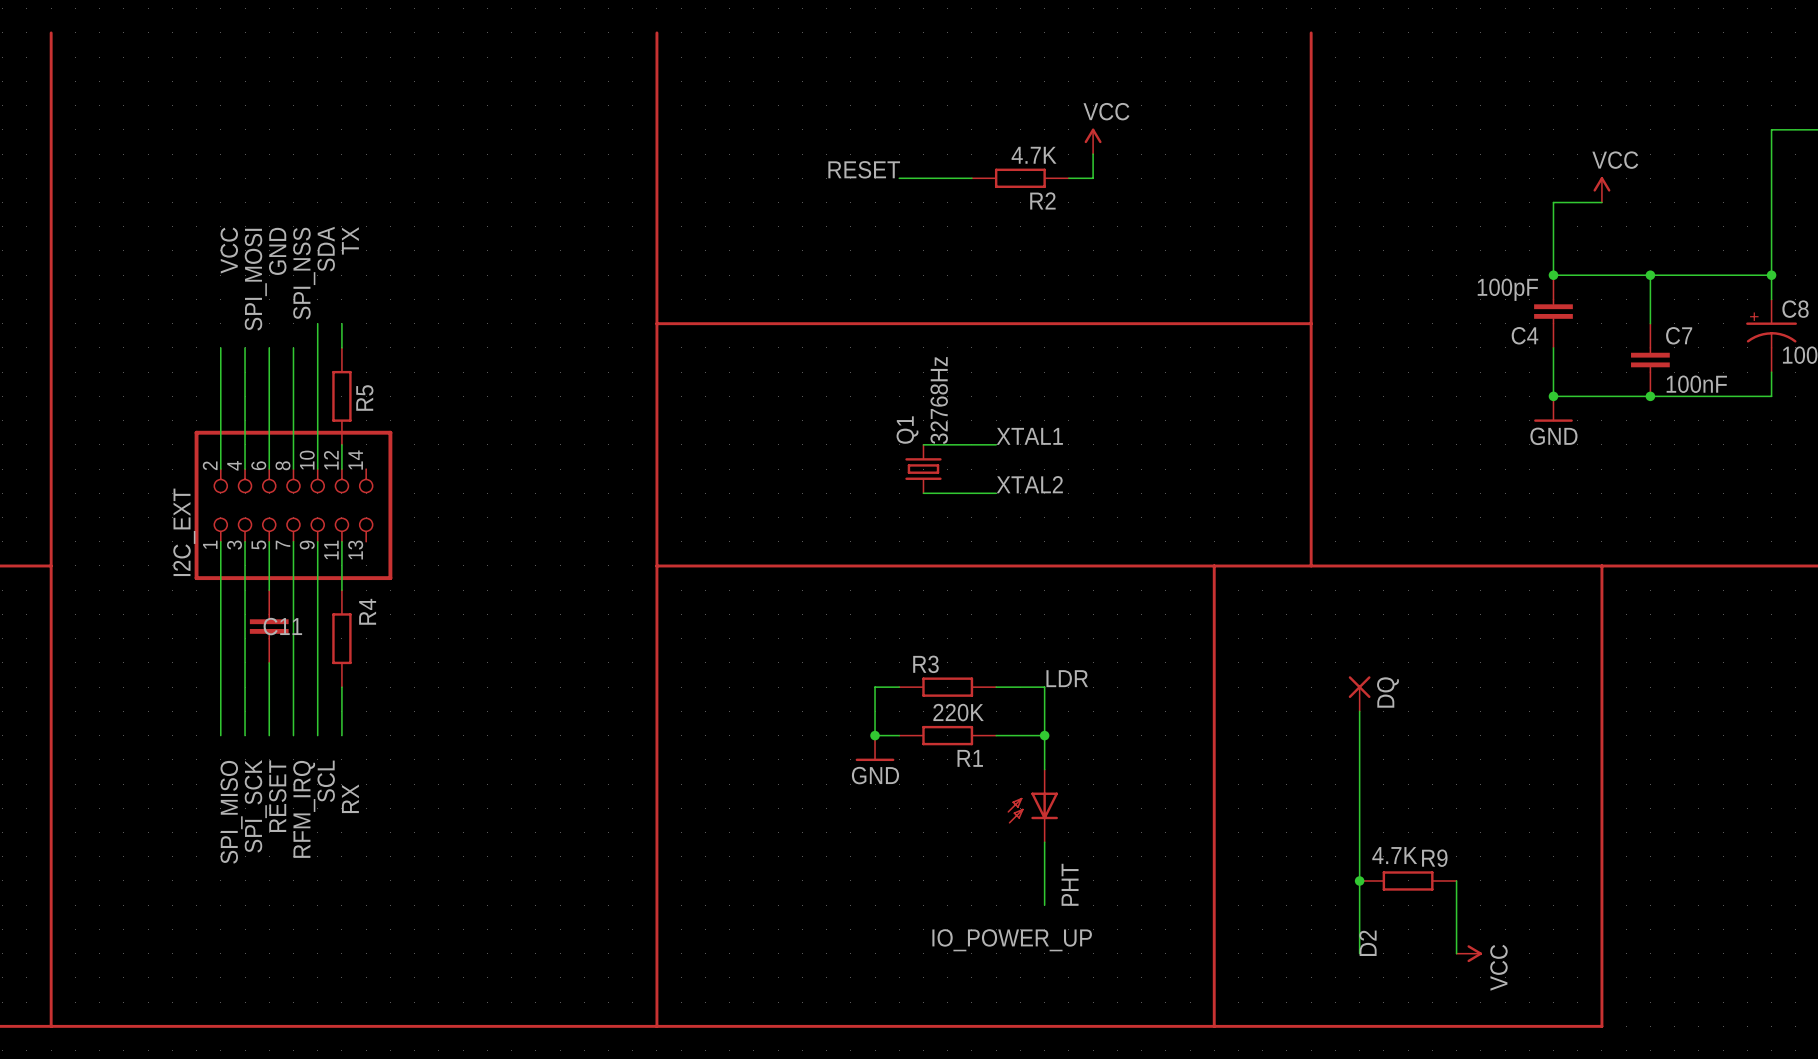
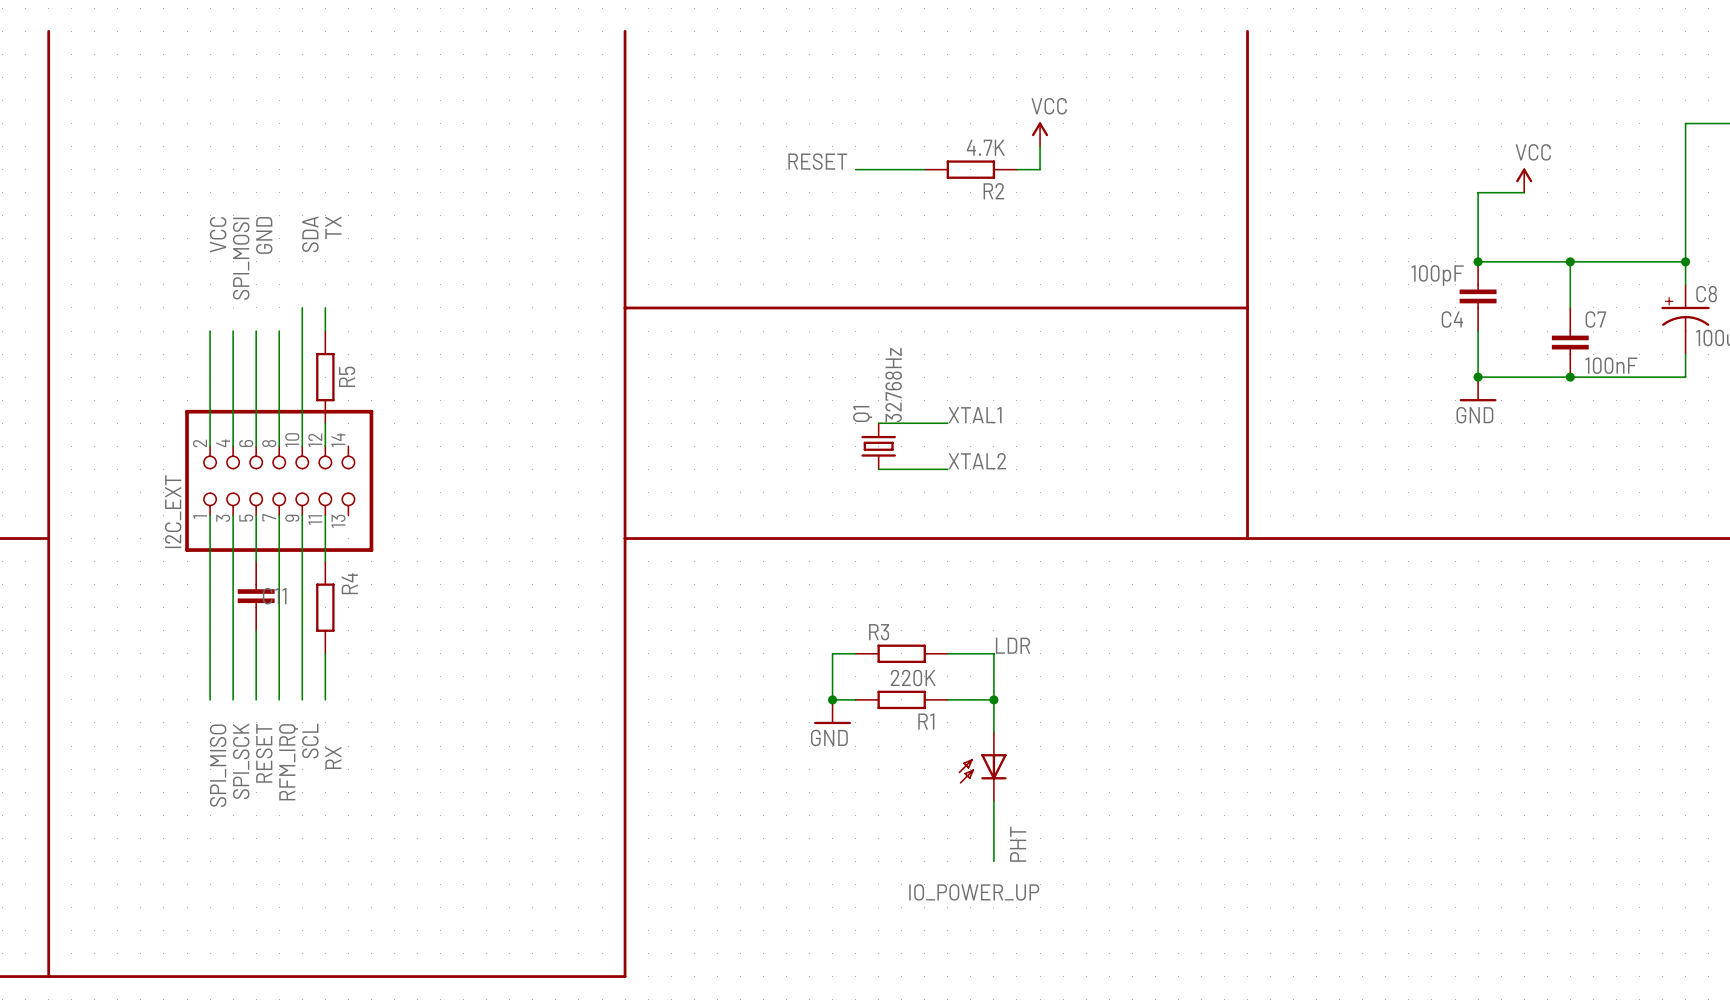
label: SPI_NSS (304, 273) -> none
line: (1214, 565) (1214, 1026) -> none
line: (1601, 565) (1601, 1026) (656, 1026) -> none
DQ: (1359, 693) -> none
wire: (1359, 711) (1359, 953) -> none
junction: (1359, 880) -> none
R9: 4.7K (1408, 880) -> none
wire: (1456, 880) (1456, 953) -> none
label: D2 (1367, 943) -> none
power symbol: VCC (1469, 953) -> none

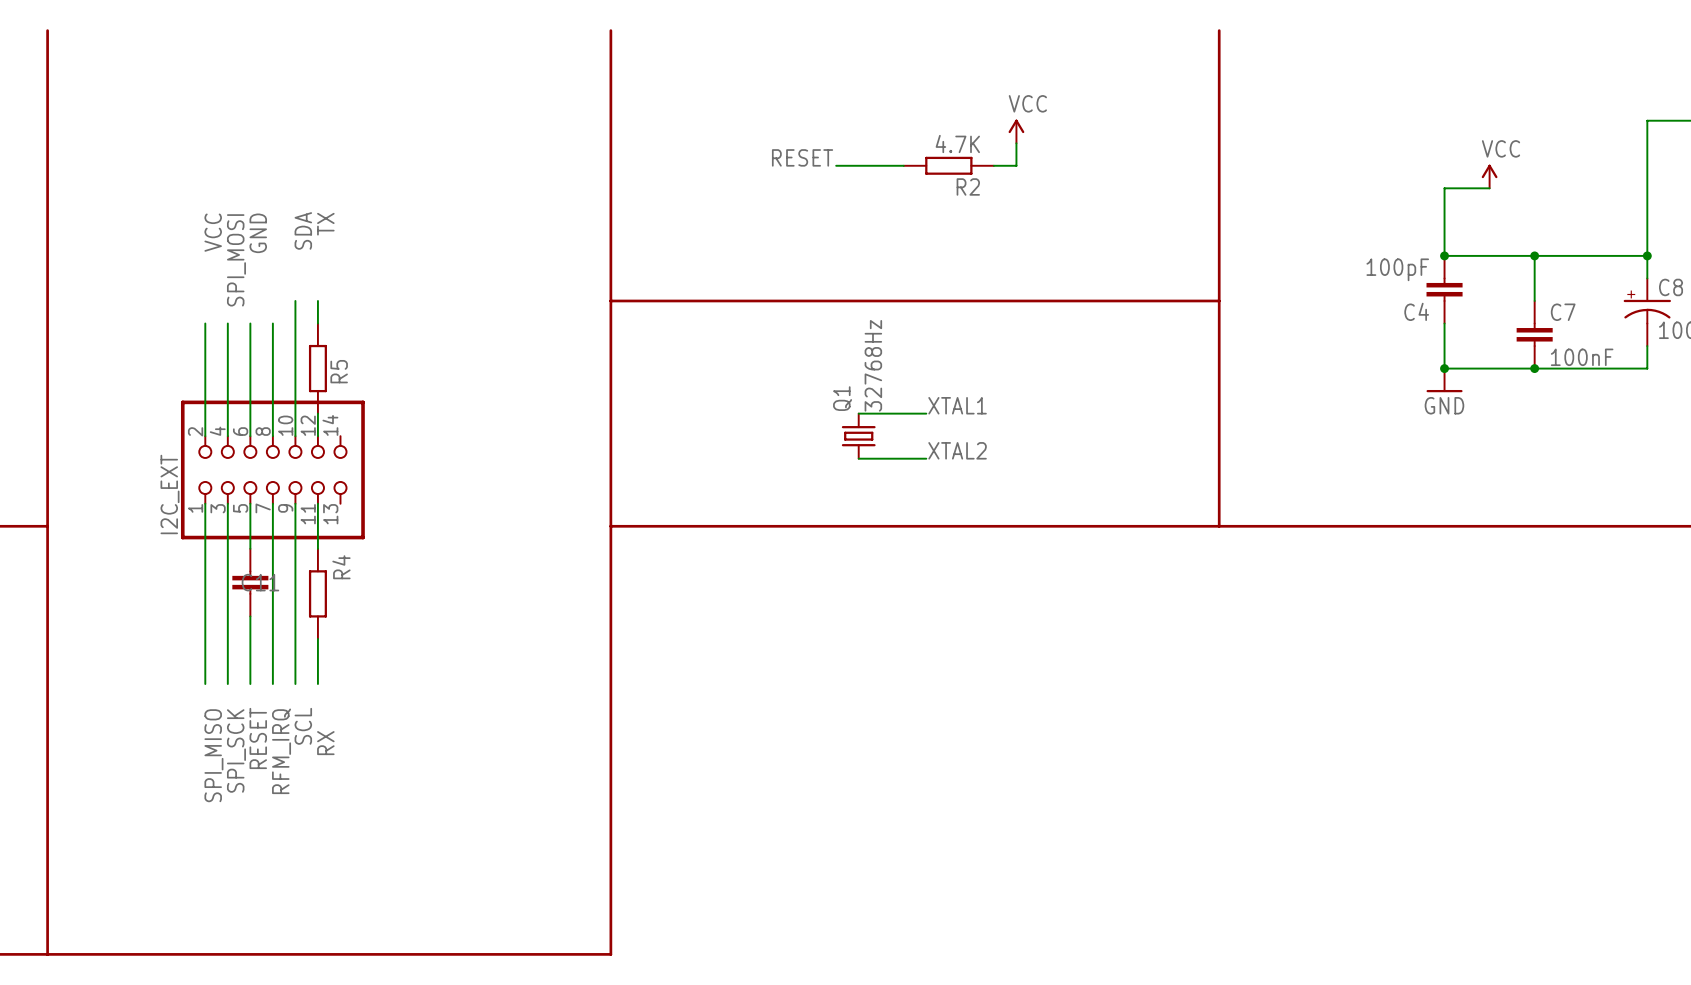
label: LDR (1013, 645) -> none
wire: (855, 653) (832, 653) (832, 699) (855, 699) -> none
R3: (901, 653) -> none
wire: (947, 653) (993, 653) (993, 732) -> none
junction: (832, 699) -> none
R1: 220K (901, 699) -> none
wire: (947, 699) (993, 699) -> none
junction: (993, 699) -> none
power symbol: GND (832, 712) -> none
PHT: (982, 766) -> none
wire: (993, 801) (993, 861) -> none
label: IO_POWER_UP (974, 892) -> none

